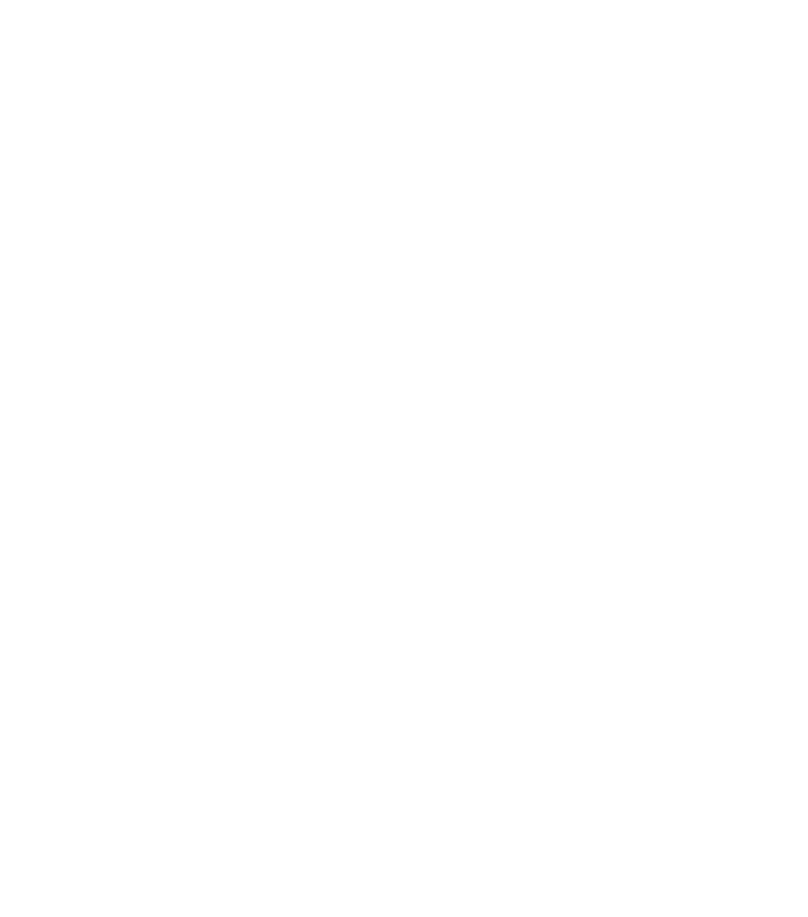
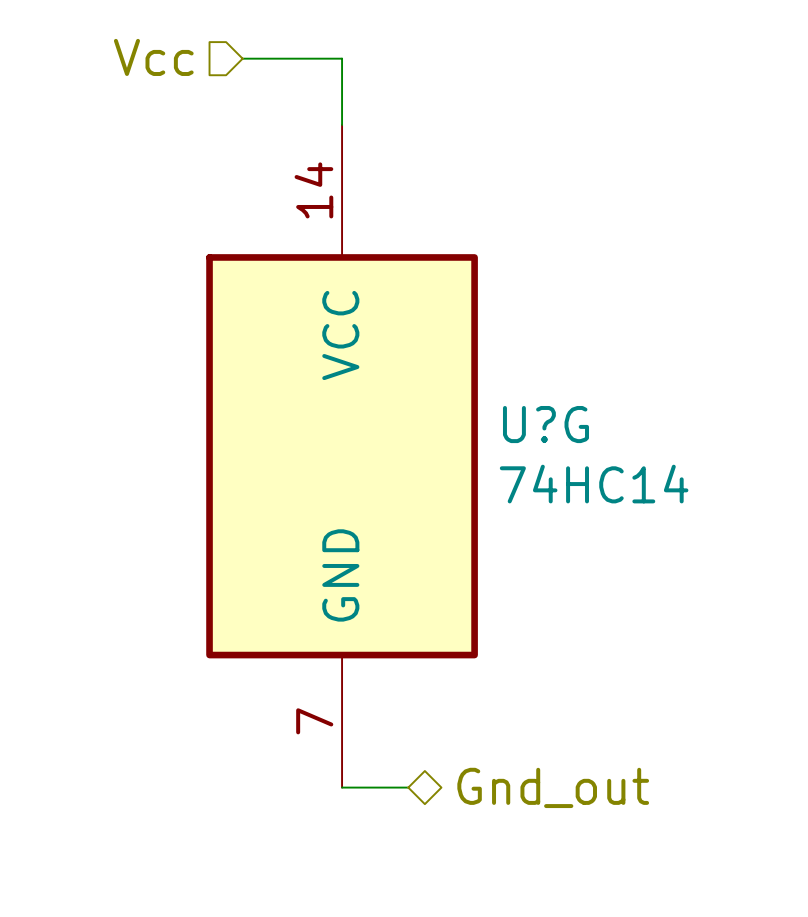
hierarchical label: none -> Vcc (153, 57)
wire: none -> (242, 58) (342, 58) (342, 124)
U?G: none -> 74HC14 (342, 456)
wire: none -> (342, 787) (408, 787)
hierarchical label: none -> Gnd_out (553, 787)

